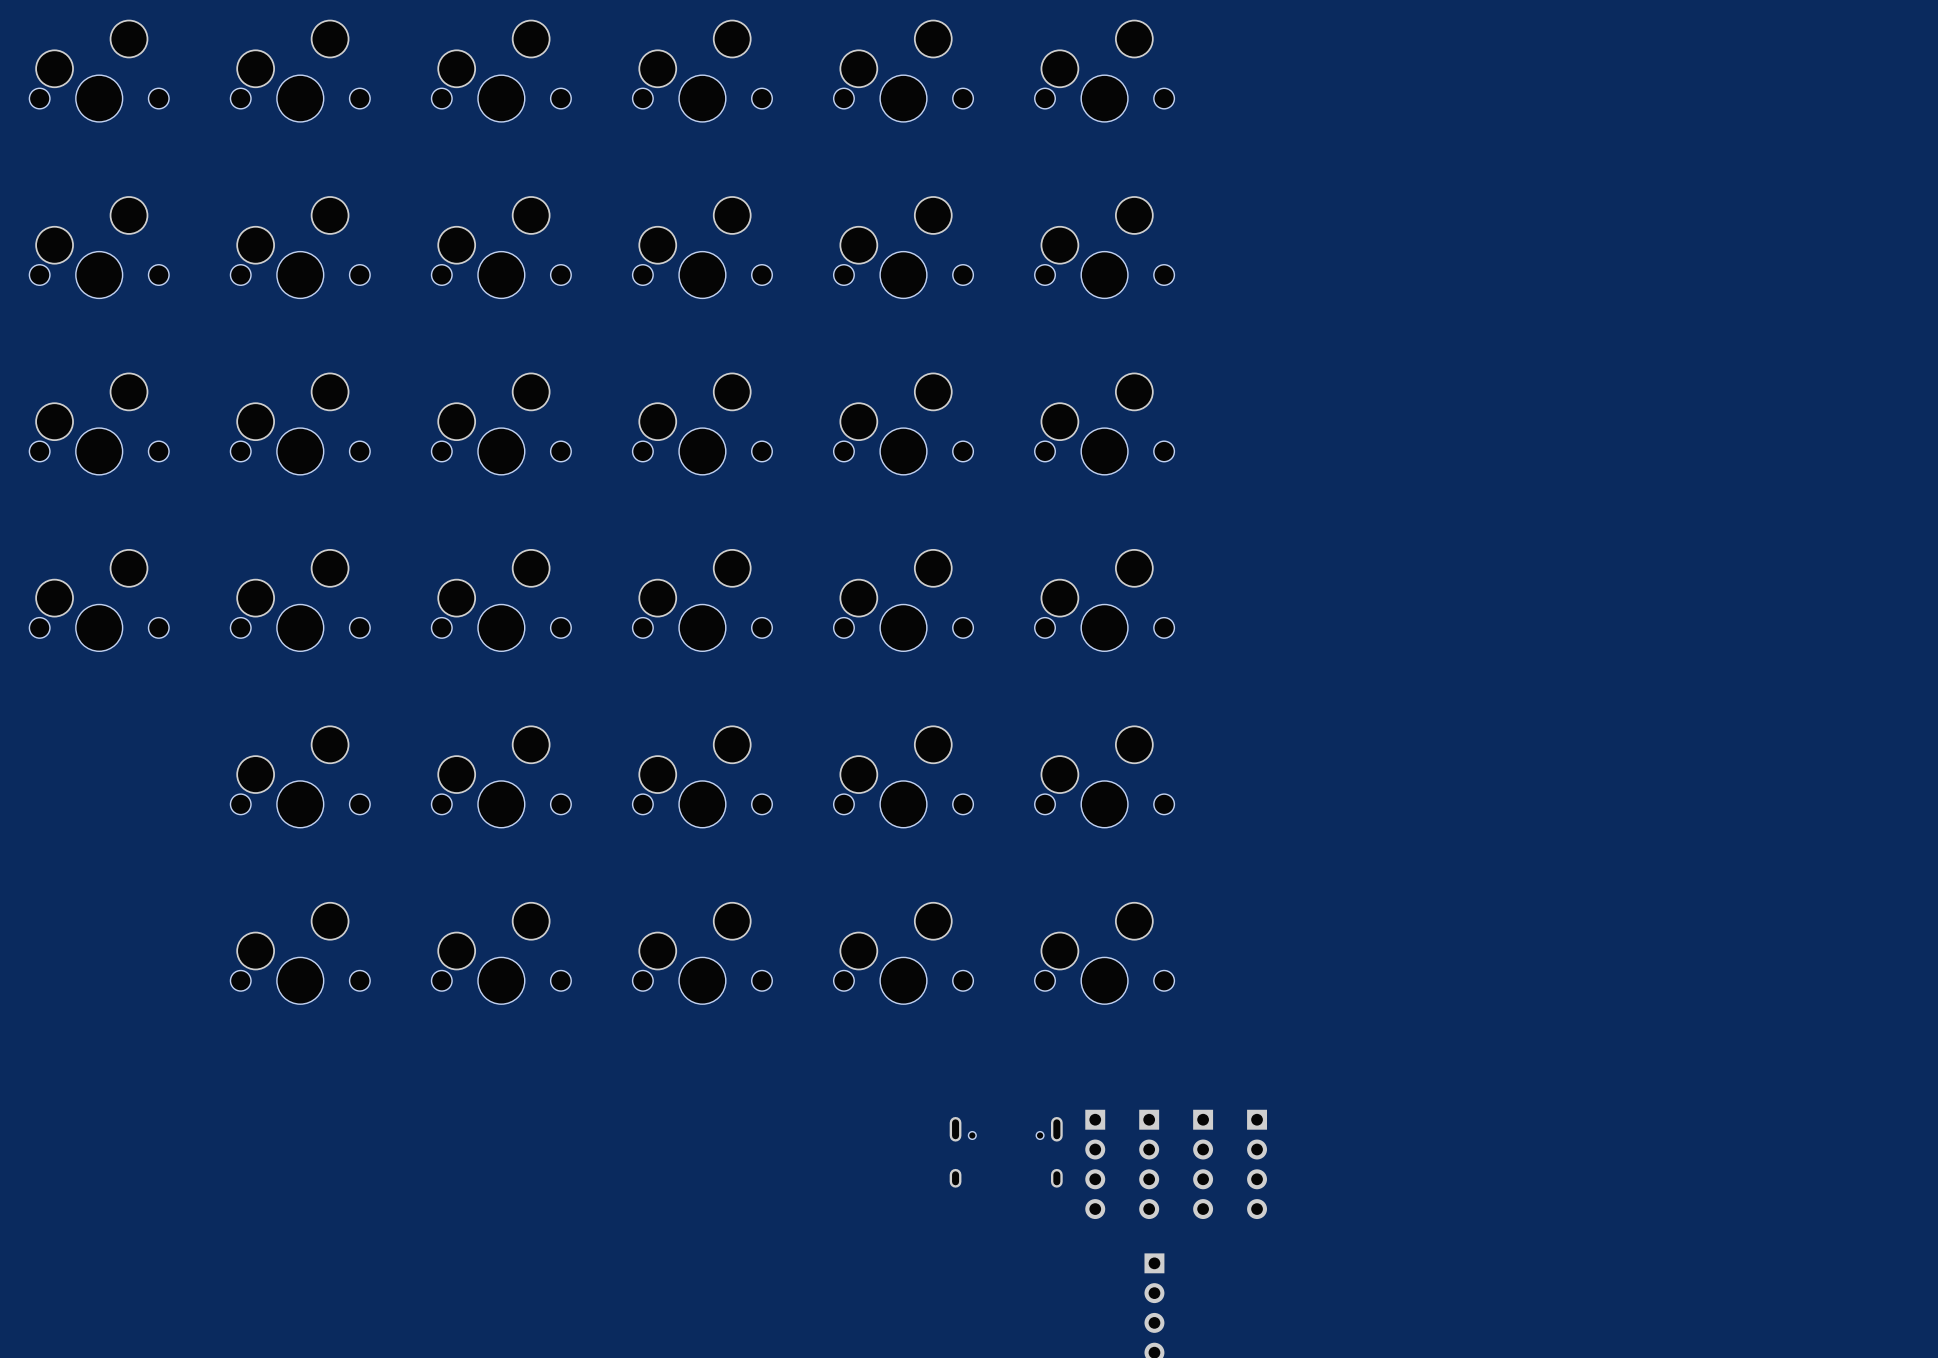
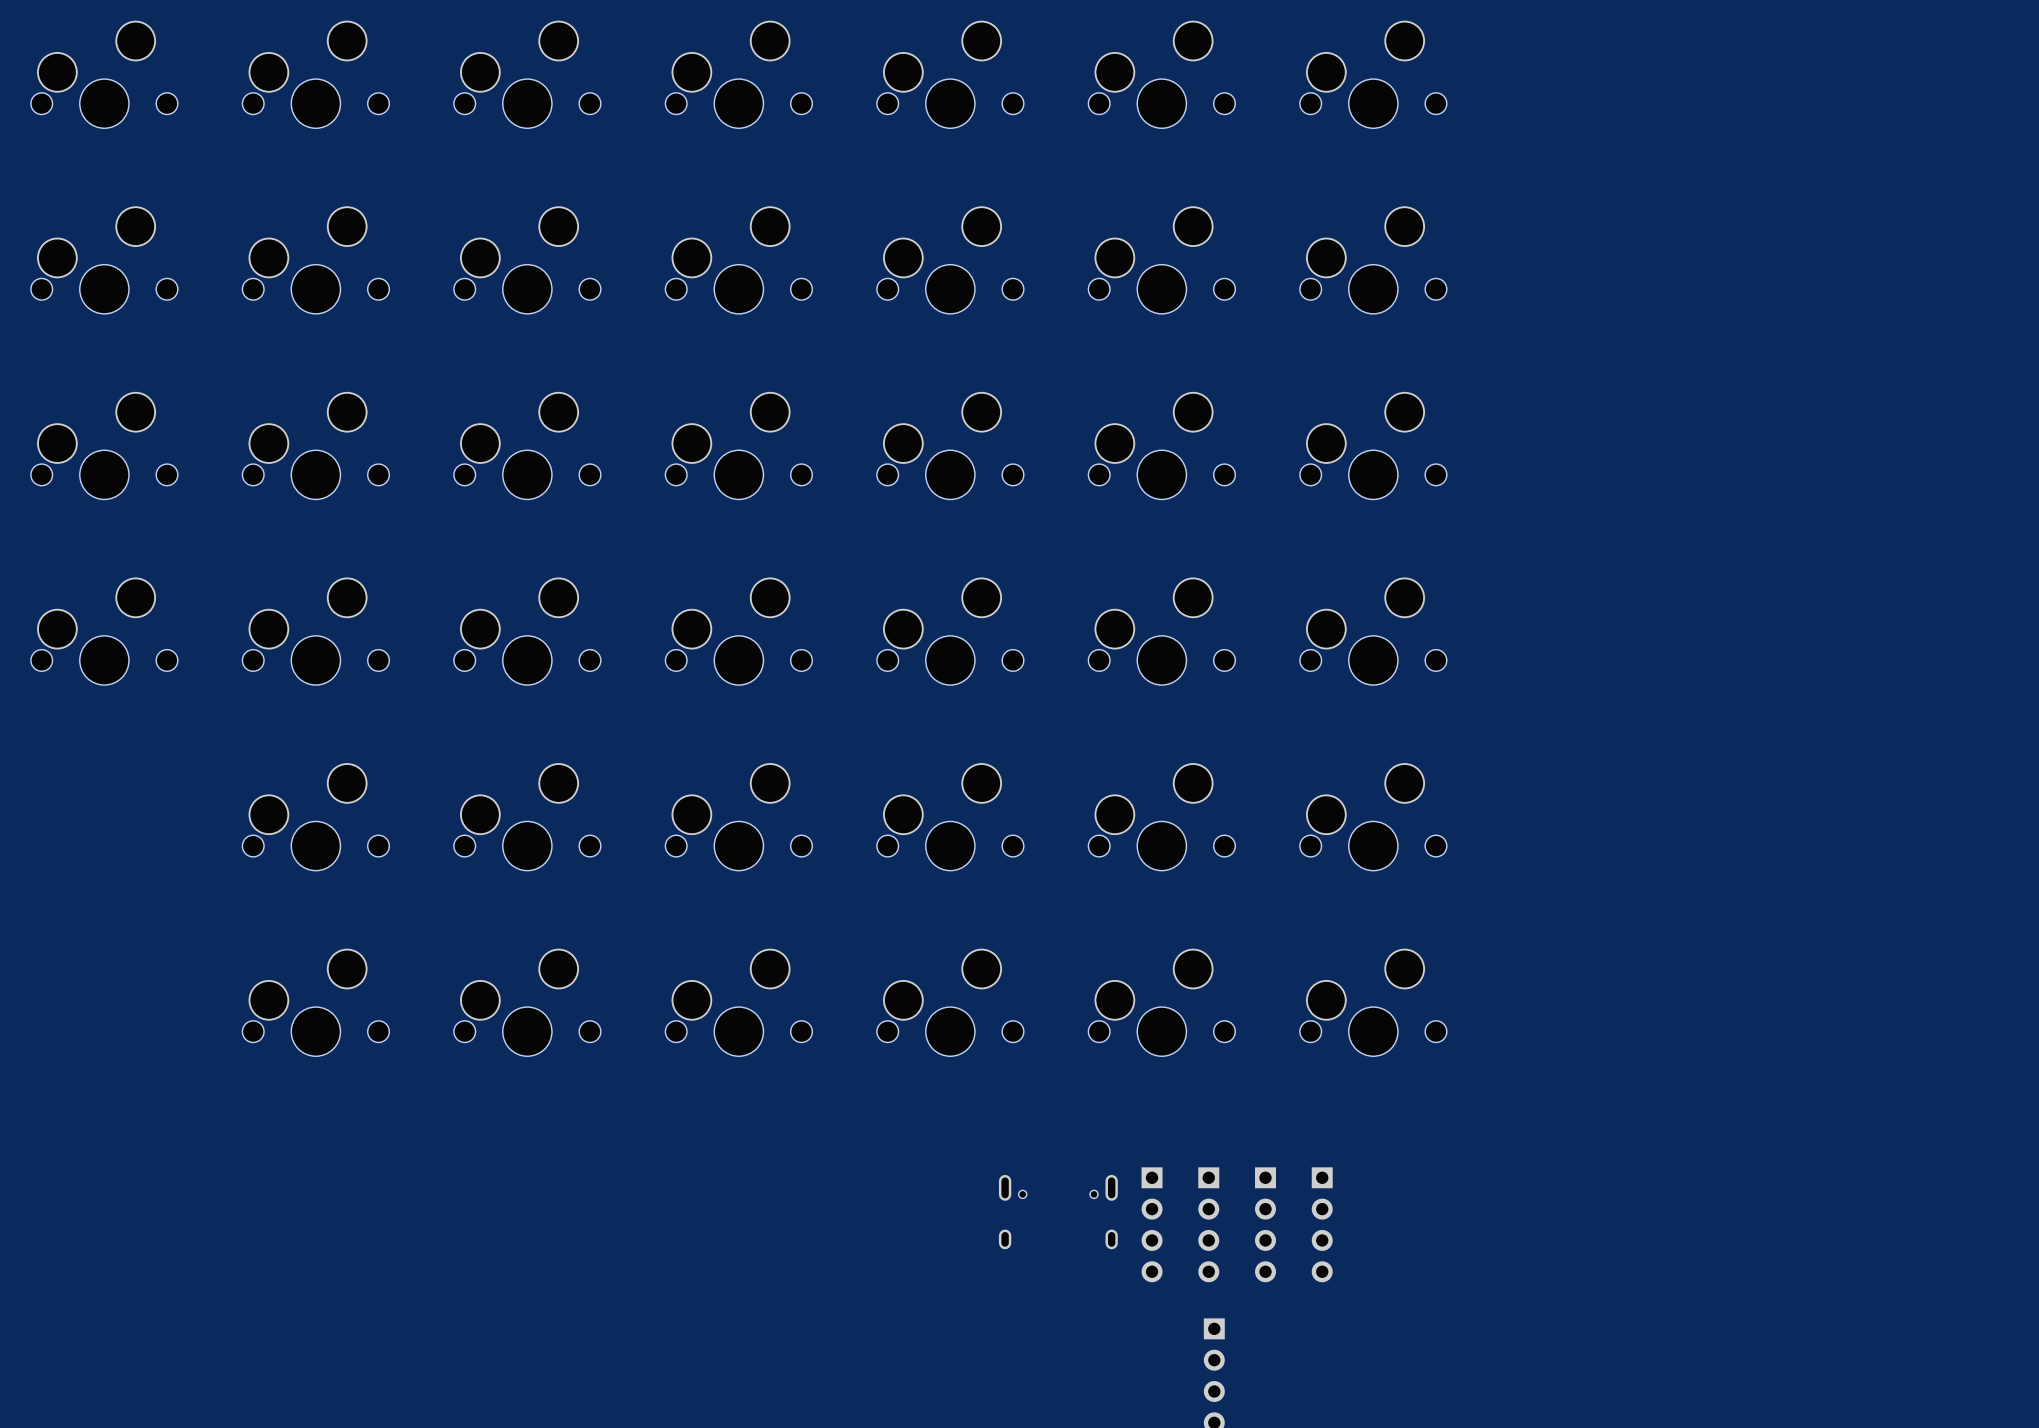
part: none -> (1373, 74)
part: none -> (1373, 260)
part: none -> (1373, 445)
part: none -> (1373, 631)
part: none -> (1373, 816)
part: none -> (1373, 1002)

